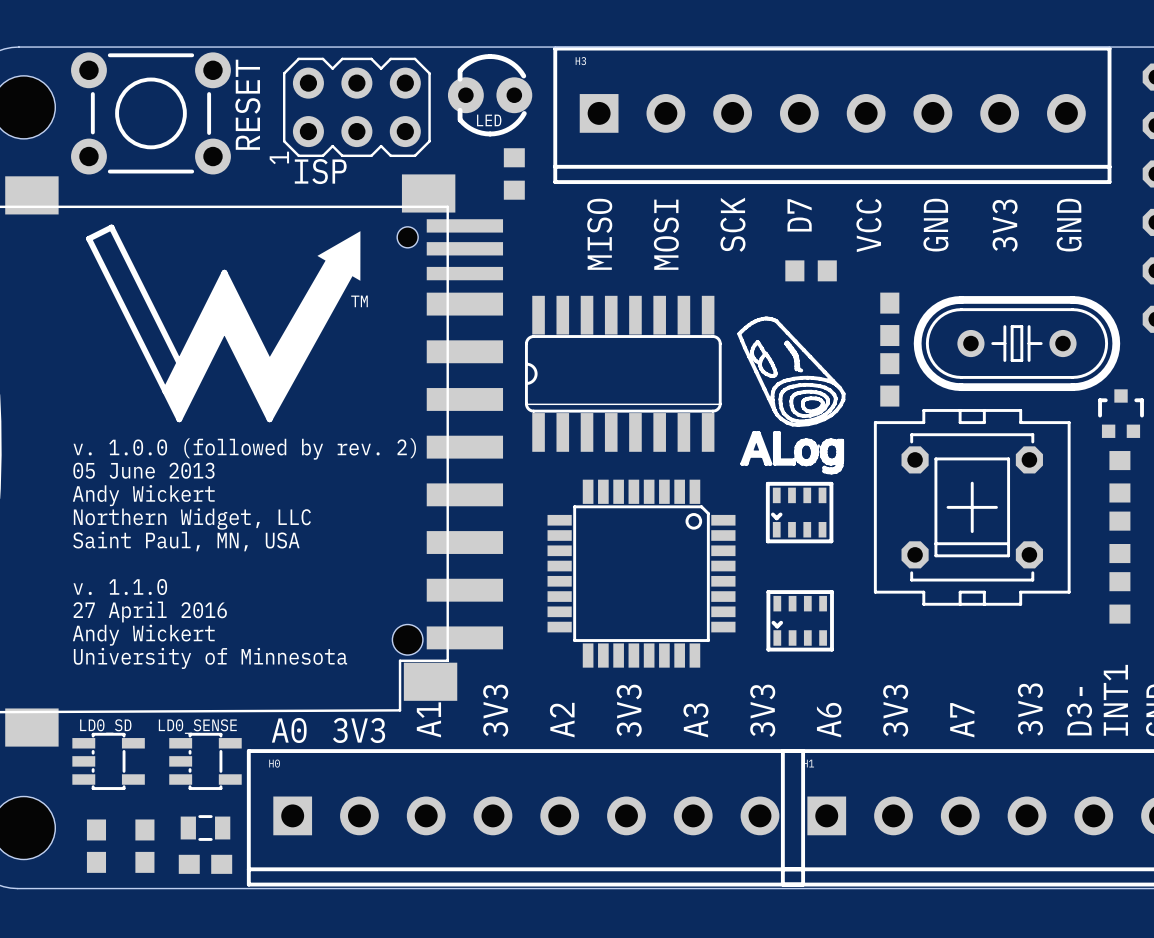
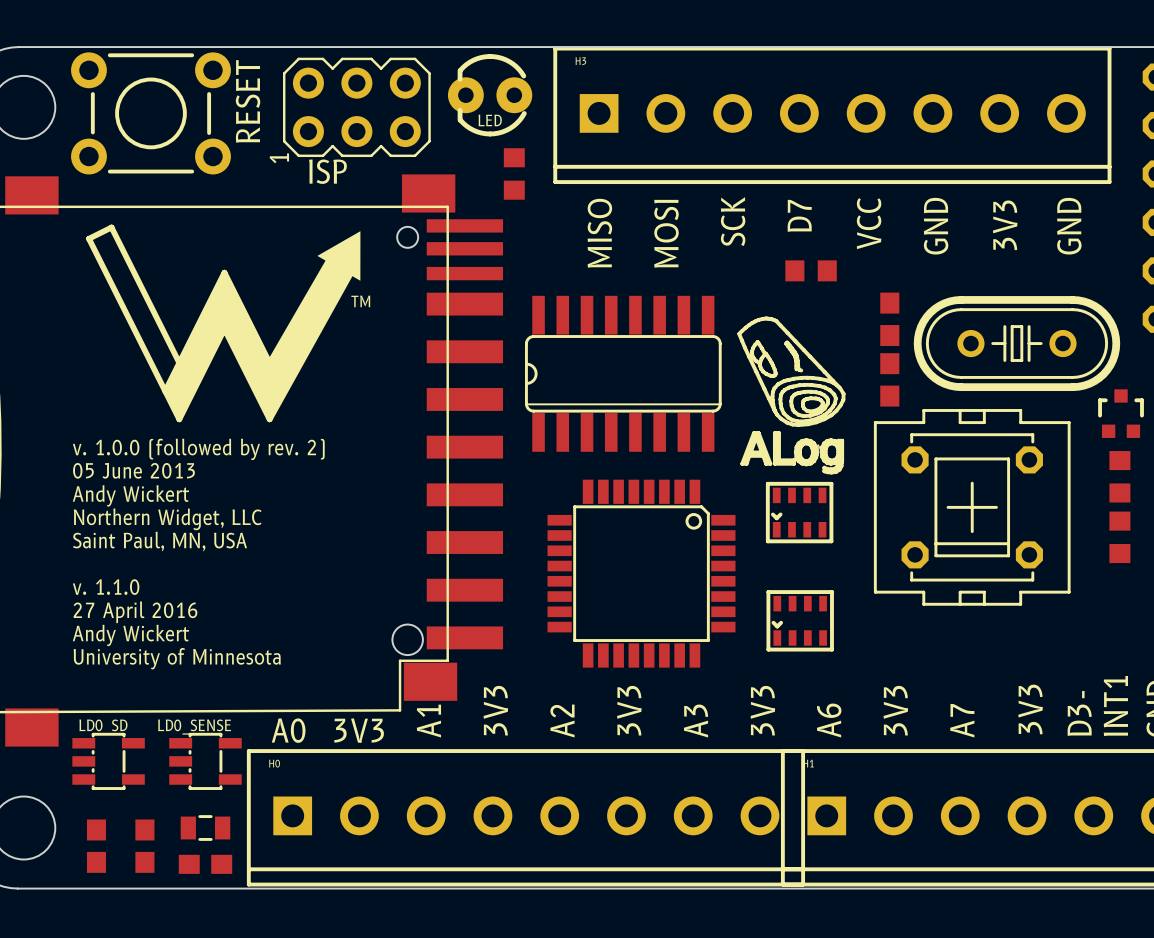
part: (1119, 597) -> none

